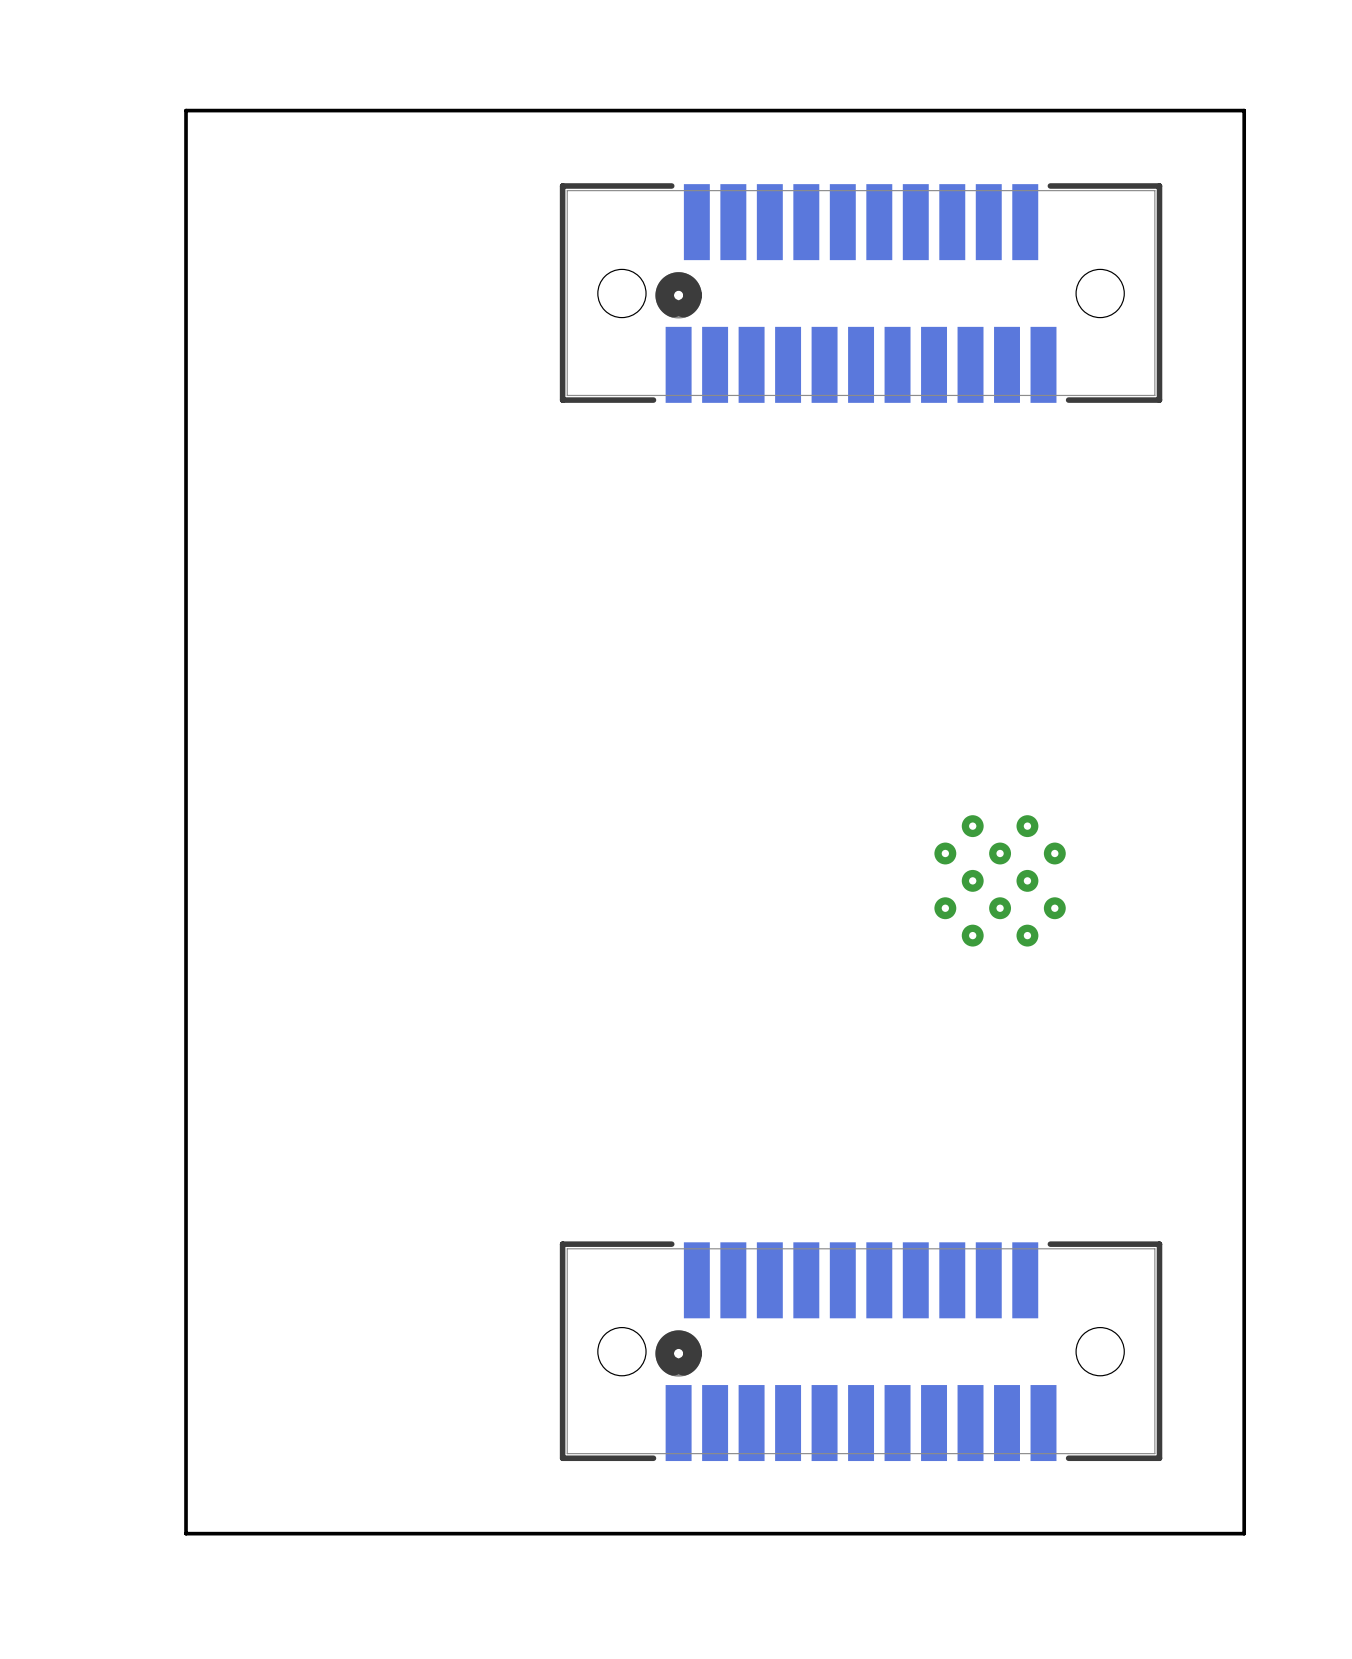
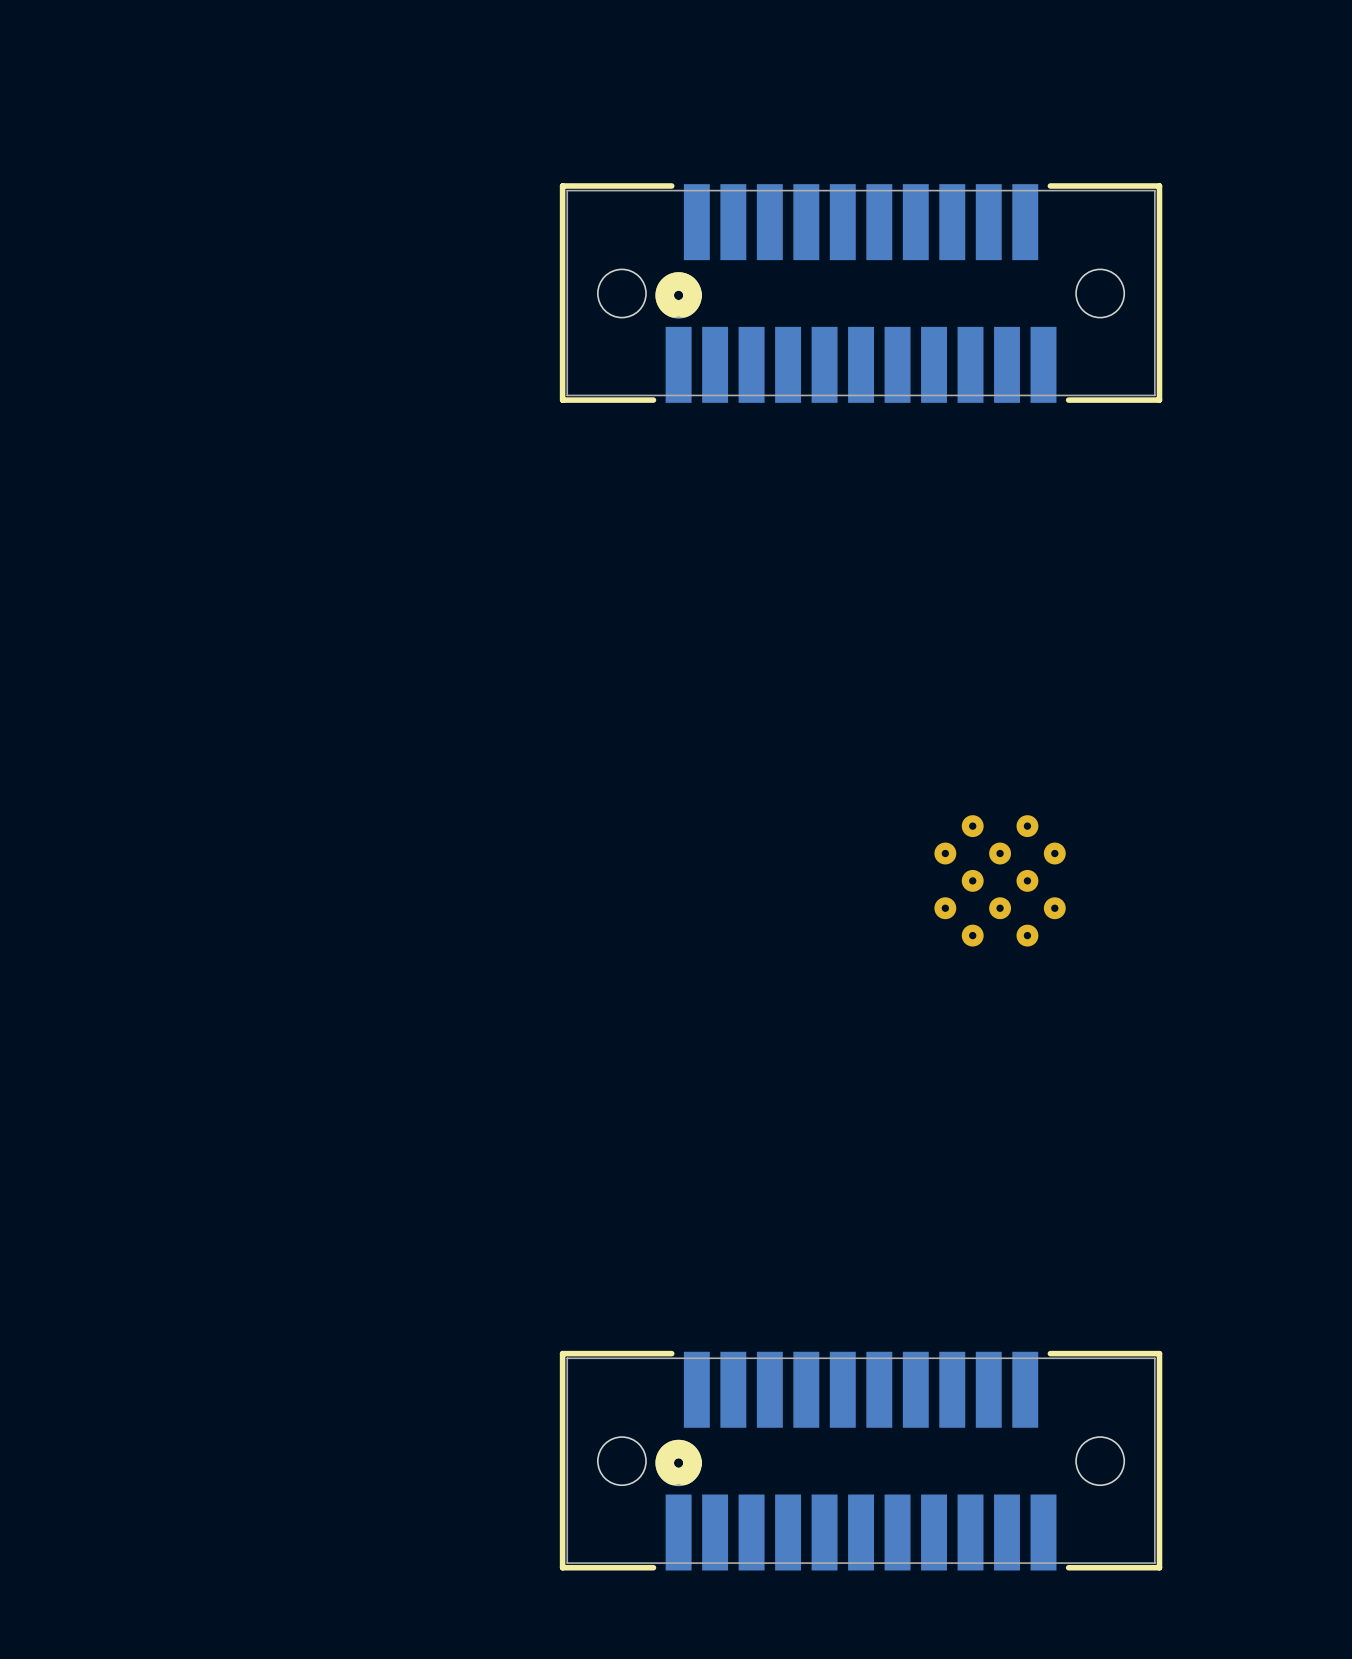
board edge: (1244, 110) (186, 110) (186, 1533) (1244, 1533) (1244, 110) -> none
part position: (861, 1351) -> (861, 1460)

